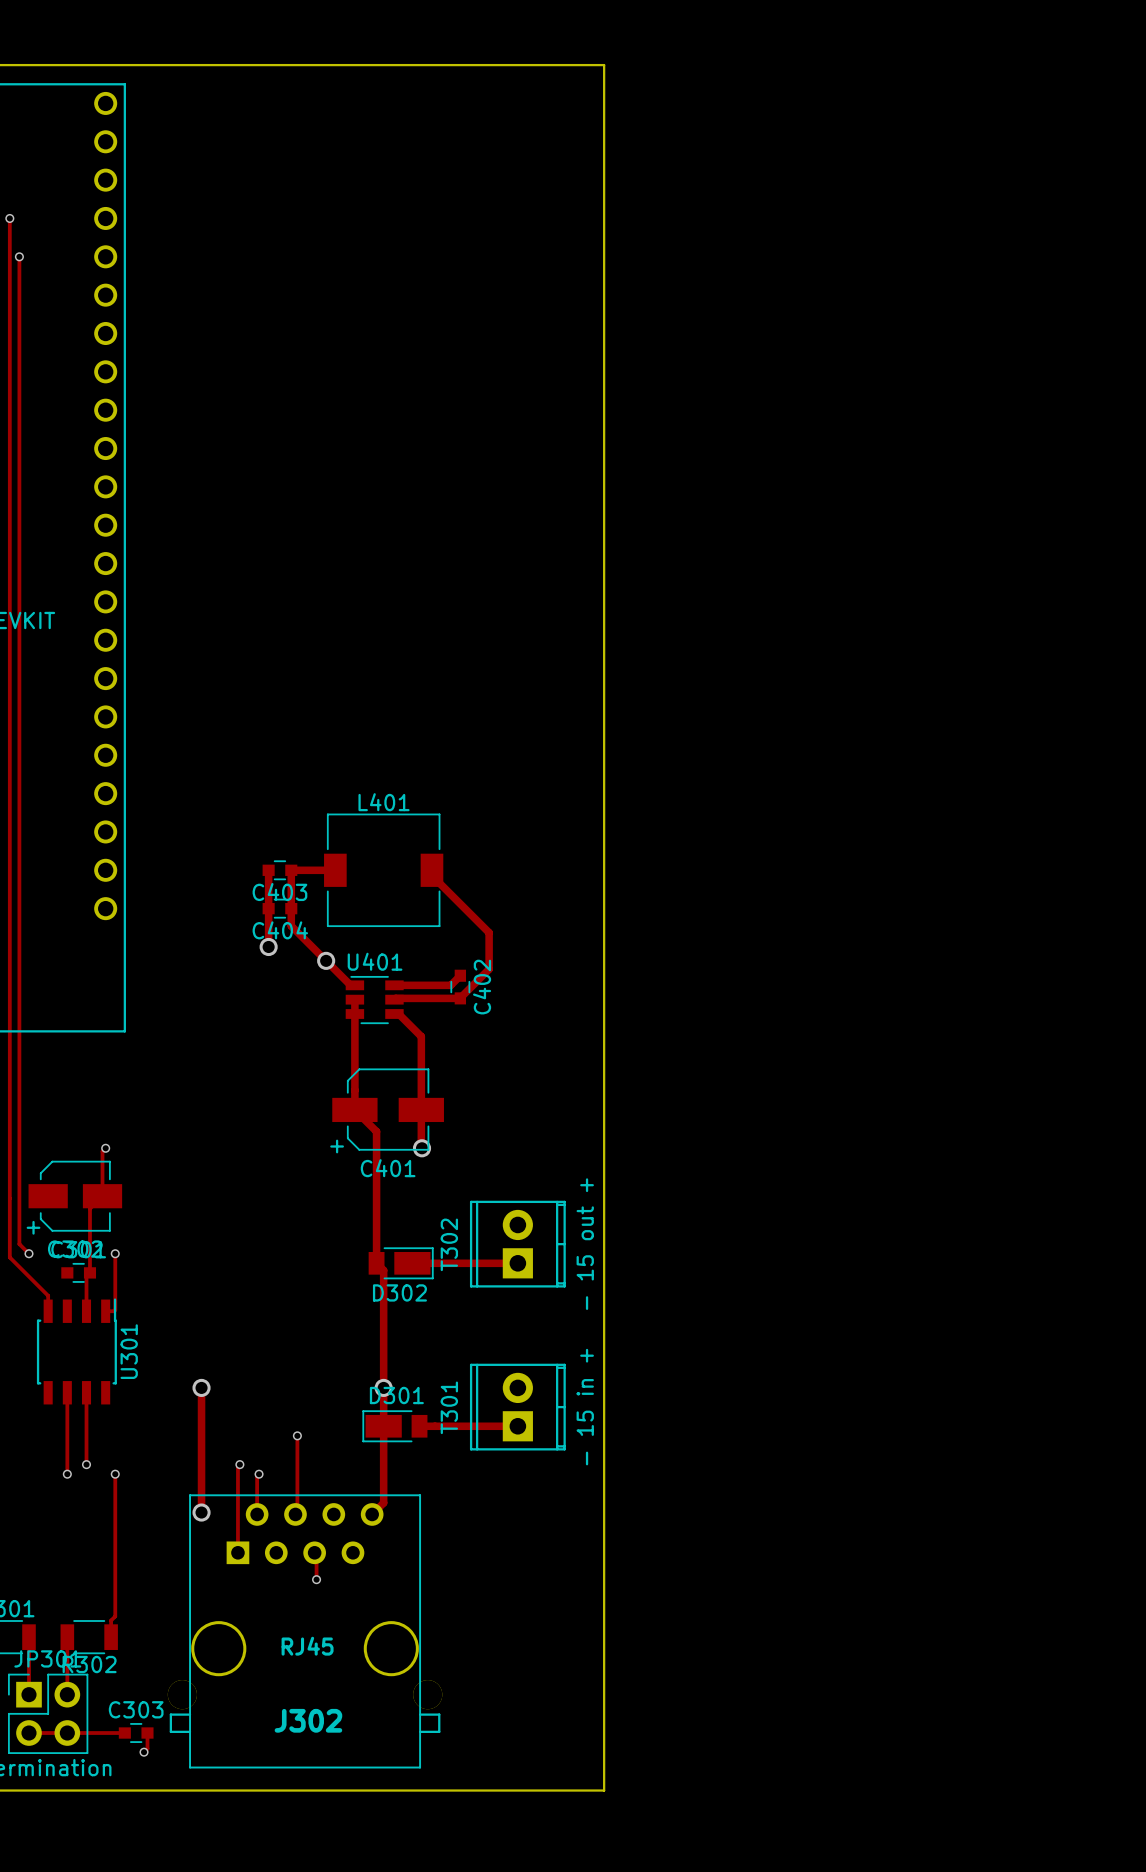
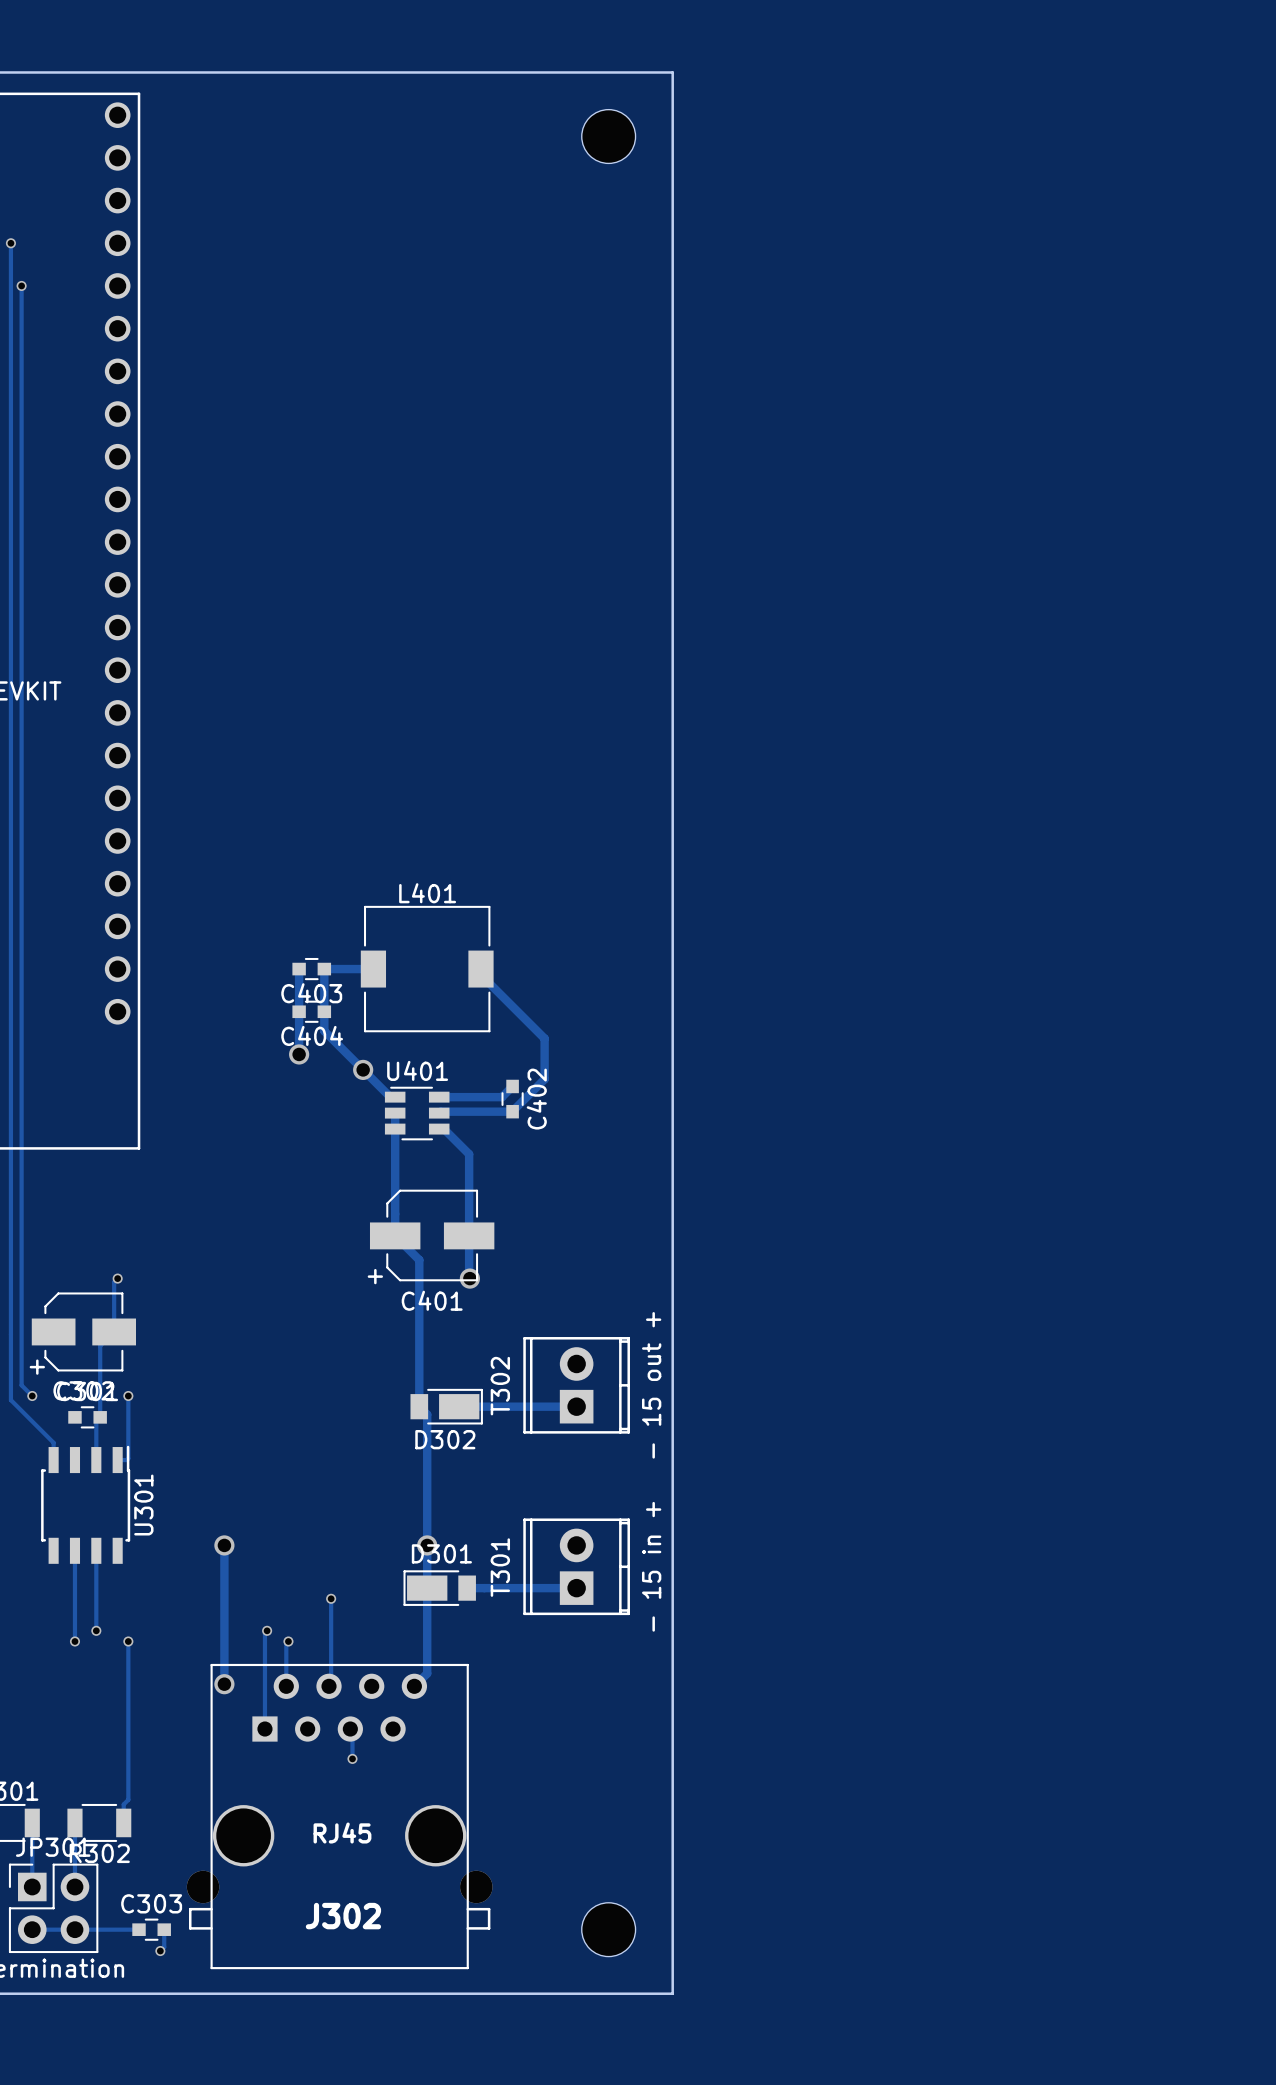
part: none -> (608, 136)
part: none -> (608, 1929)

